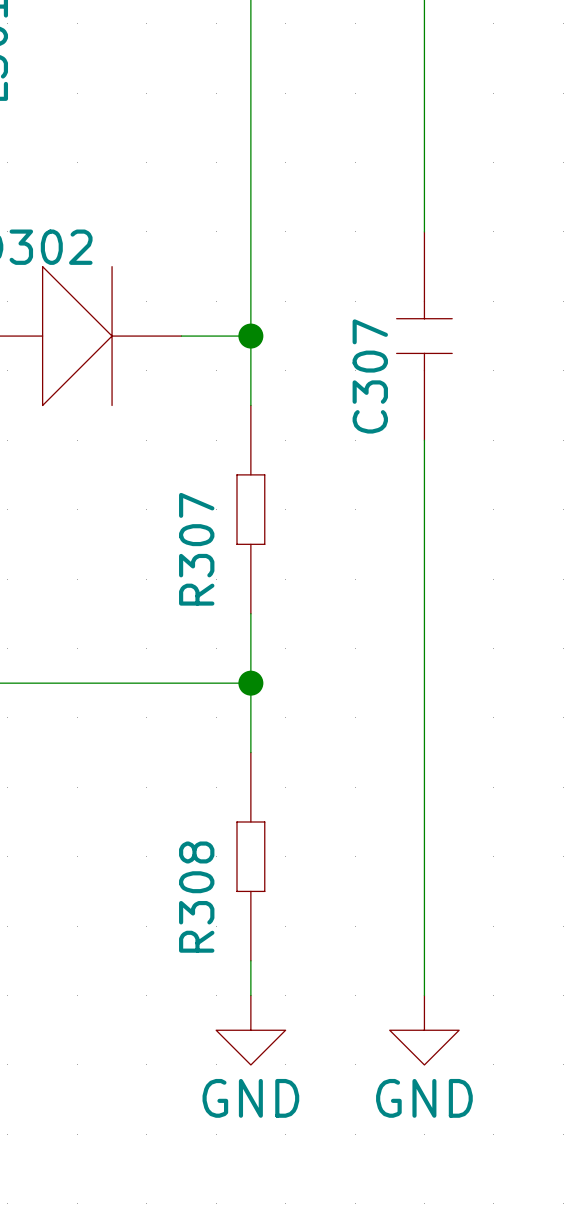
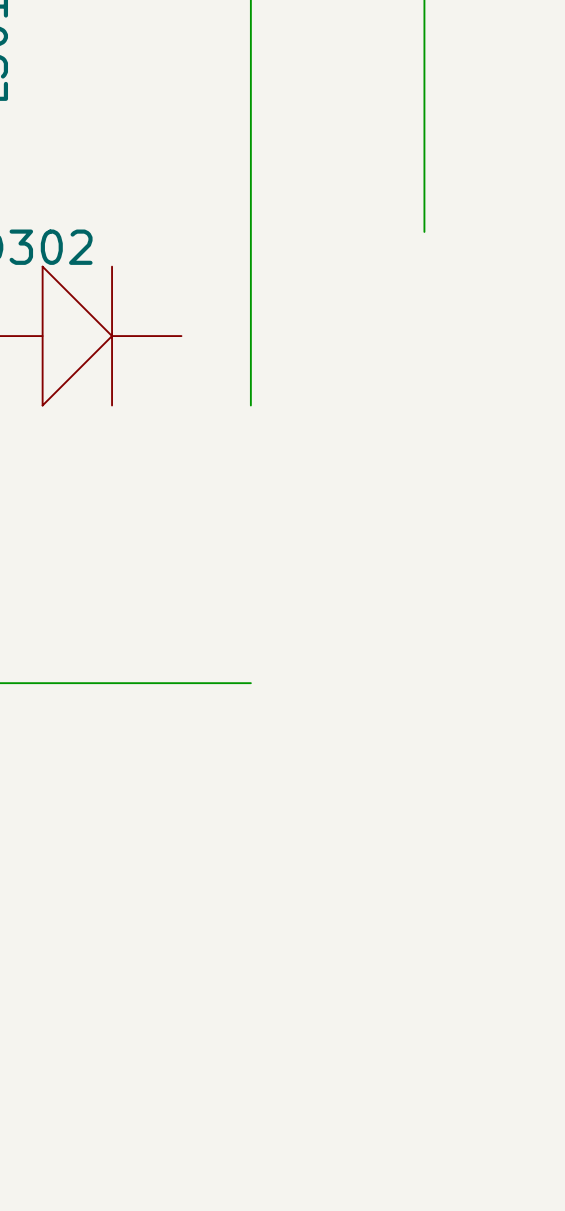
wire: (181, 336) (250, 336) -> none
junction: (250, 336) -> none
C307: (424, 336) -> none
wire: (424, 440) (424, 995) -> none
R307: (250, 509) -> none
wire: (250, 613) (250, 752) -> none
junction: (250, 683) -> none
R308: (250, 856) -> none
wire: (250, 960) (250, 995) -> none
power symbol: GND (250, 1030) -> none
power symbol: GND (424, 1030) -> none

